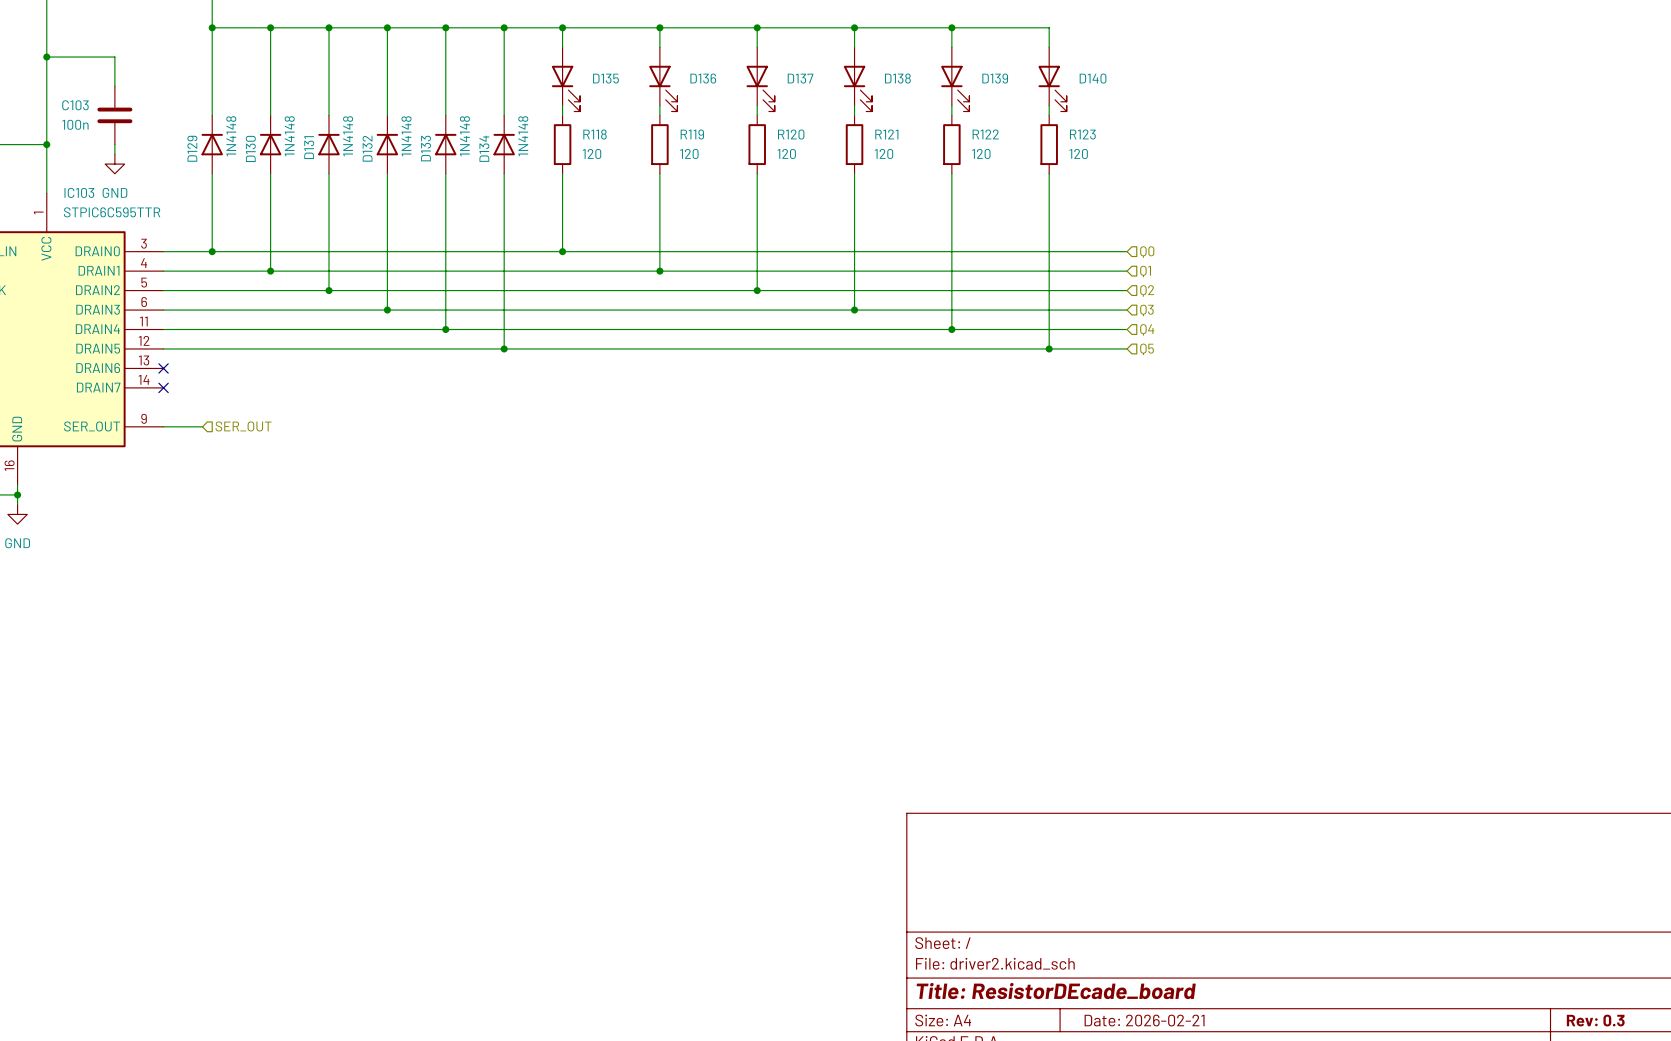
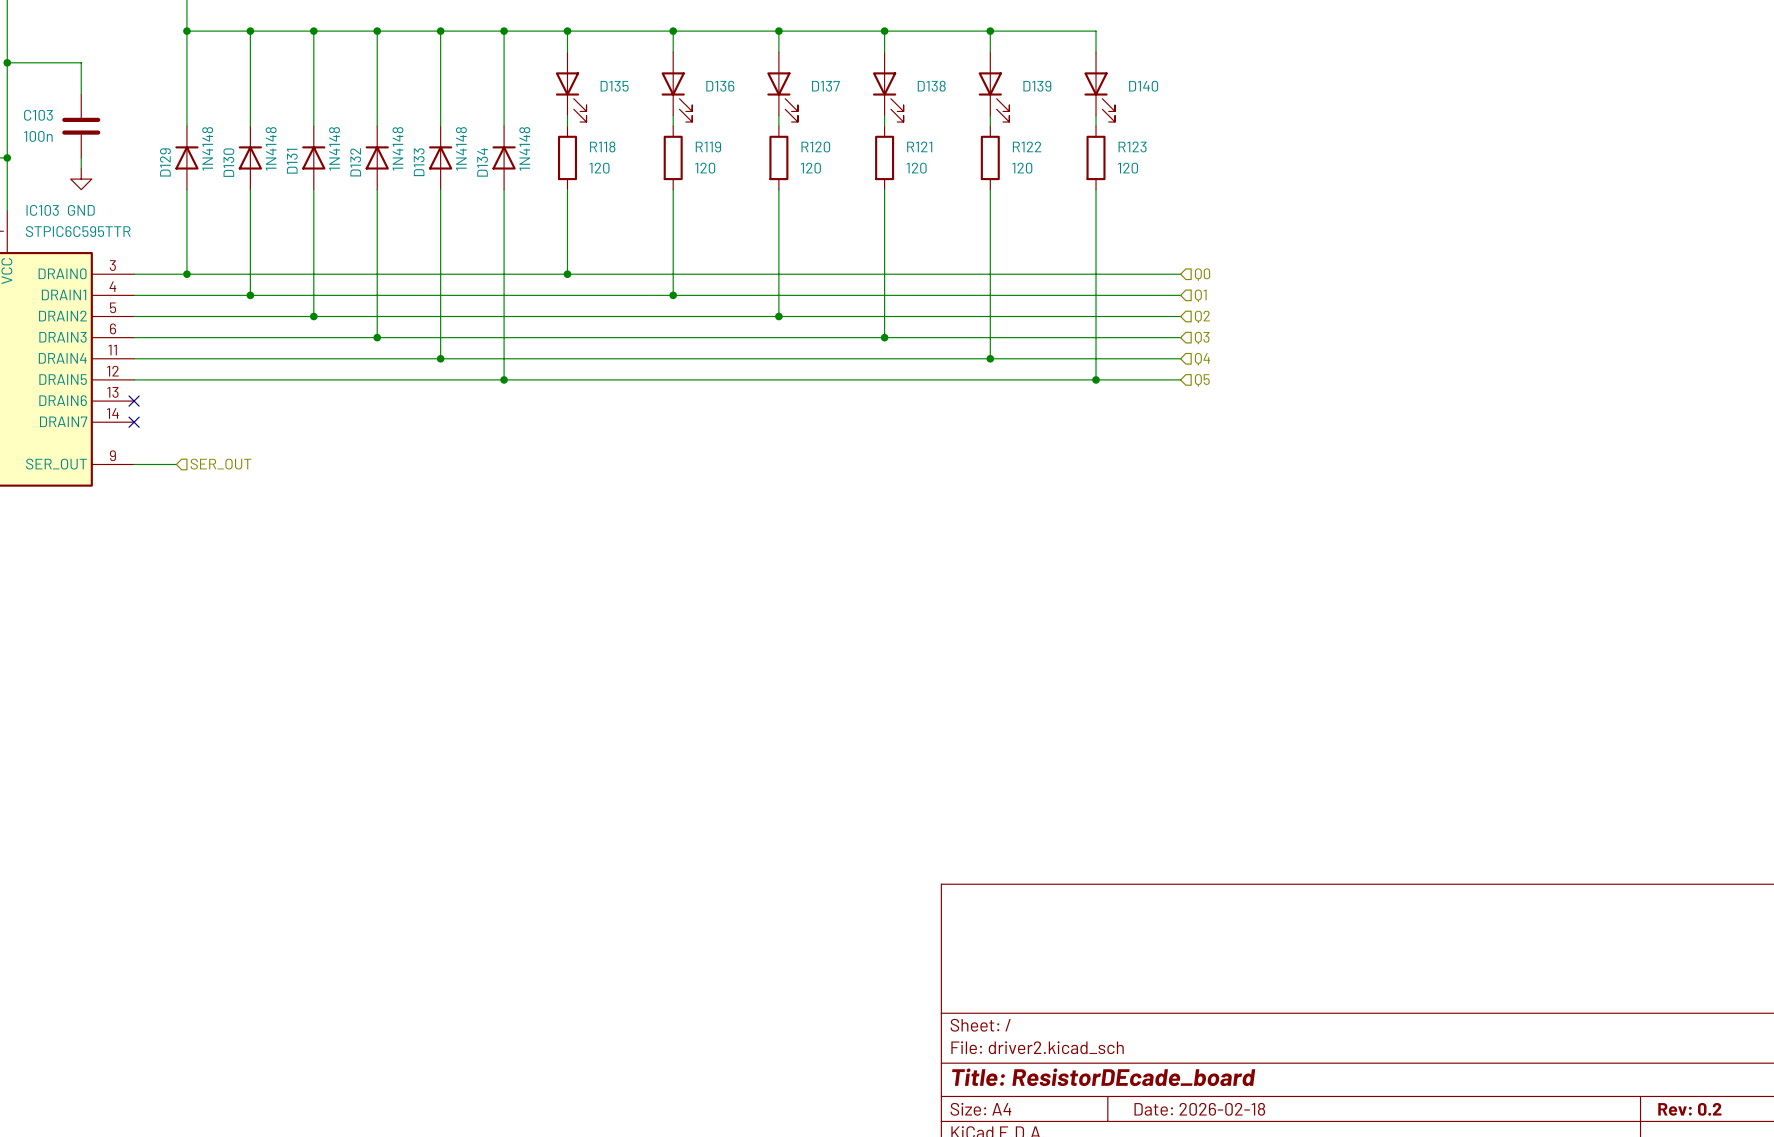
title block: Date: 2026-02-21 (1144, 1020) -> Date: 2026-02-18 (1199, 1109)
title block: Rev: 0.3 (1595, 1020) -> Rev: 0.2 (1689, 1109)

